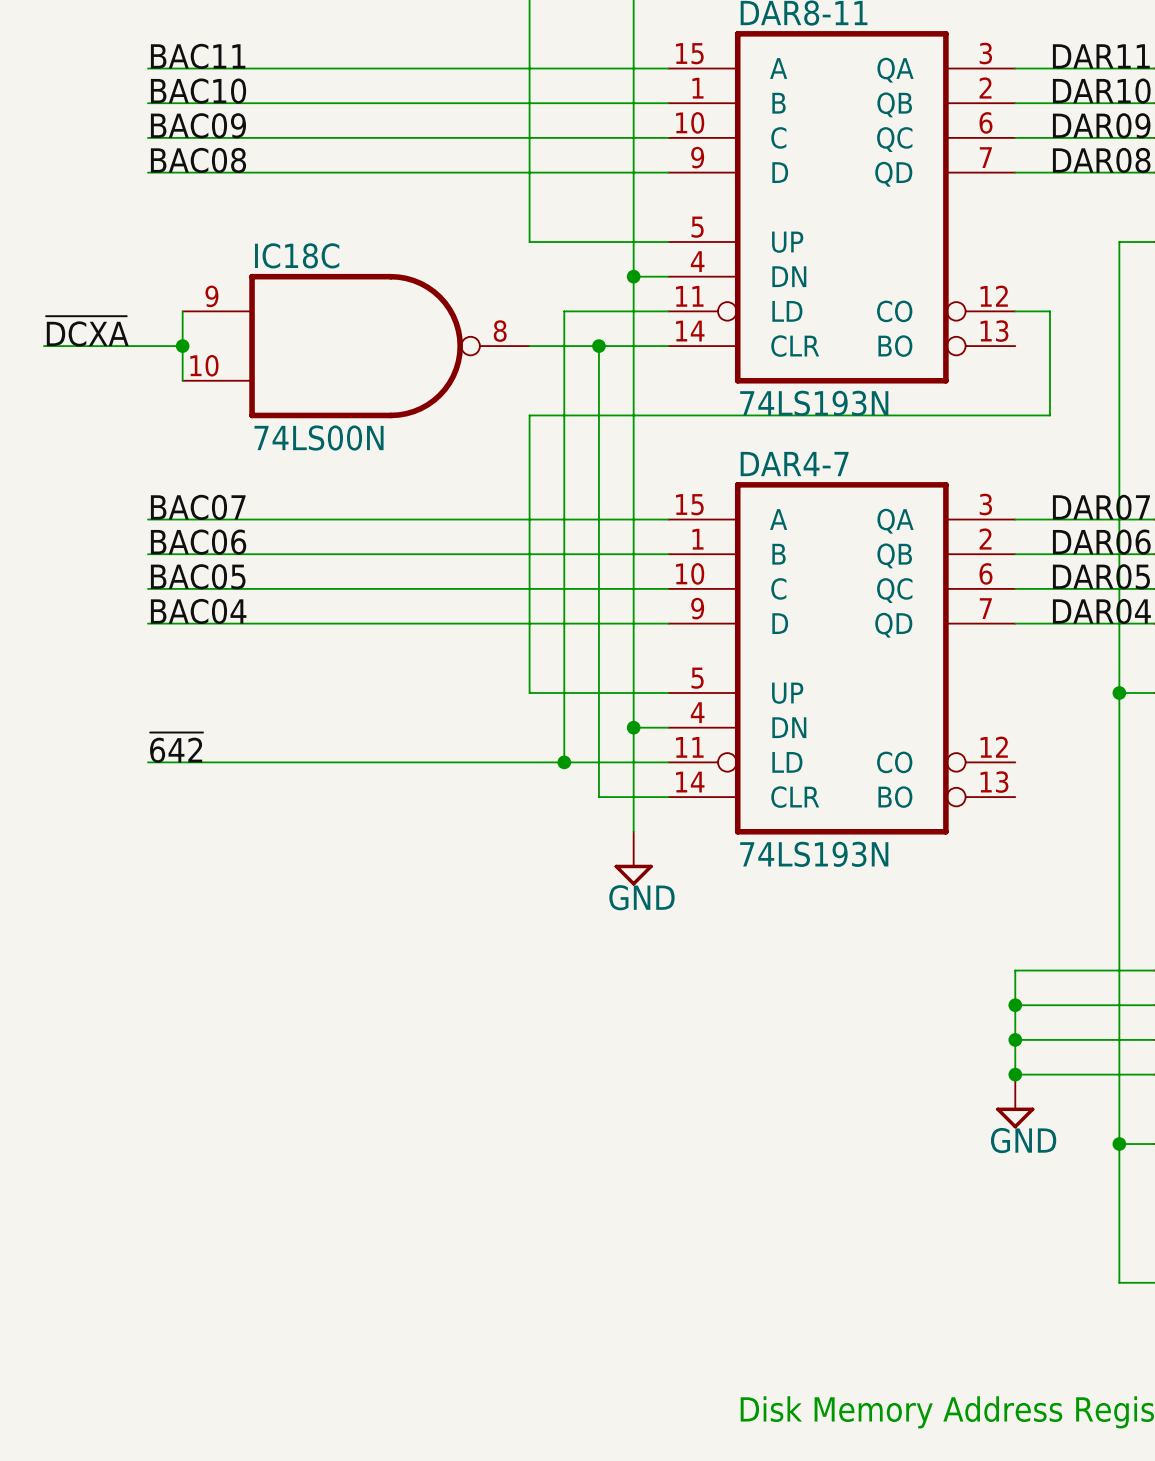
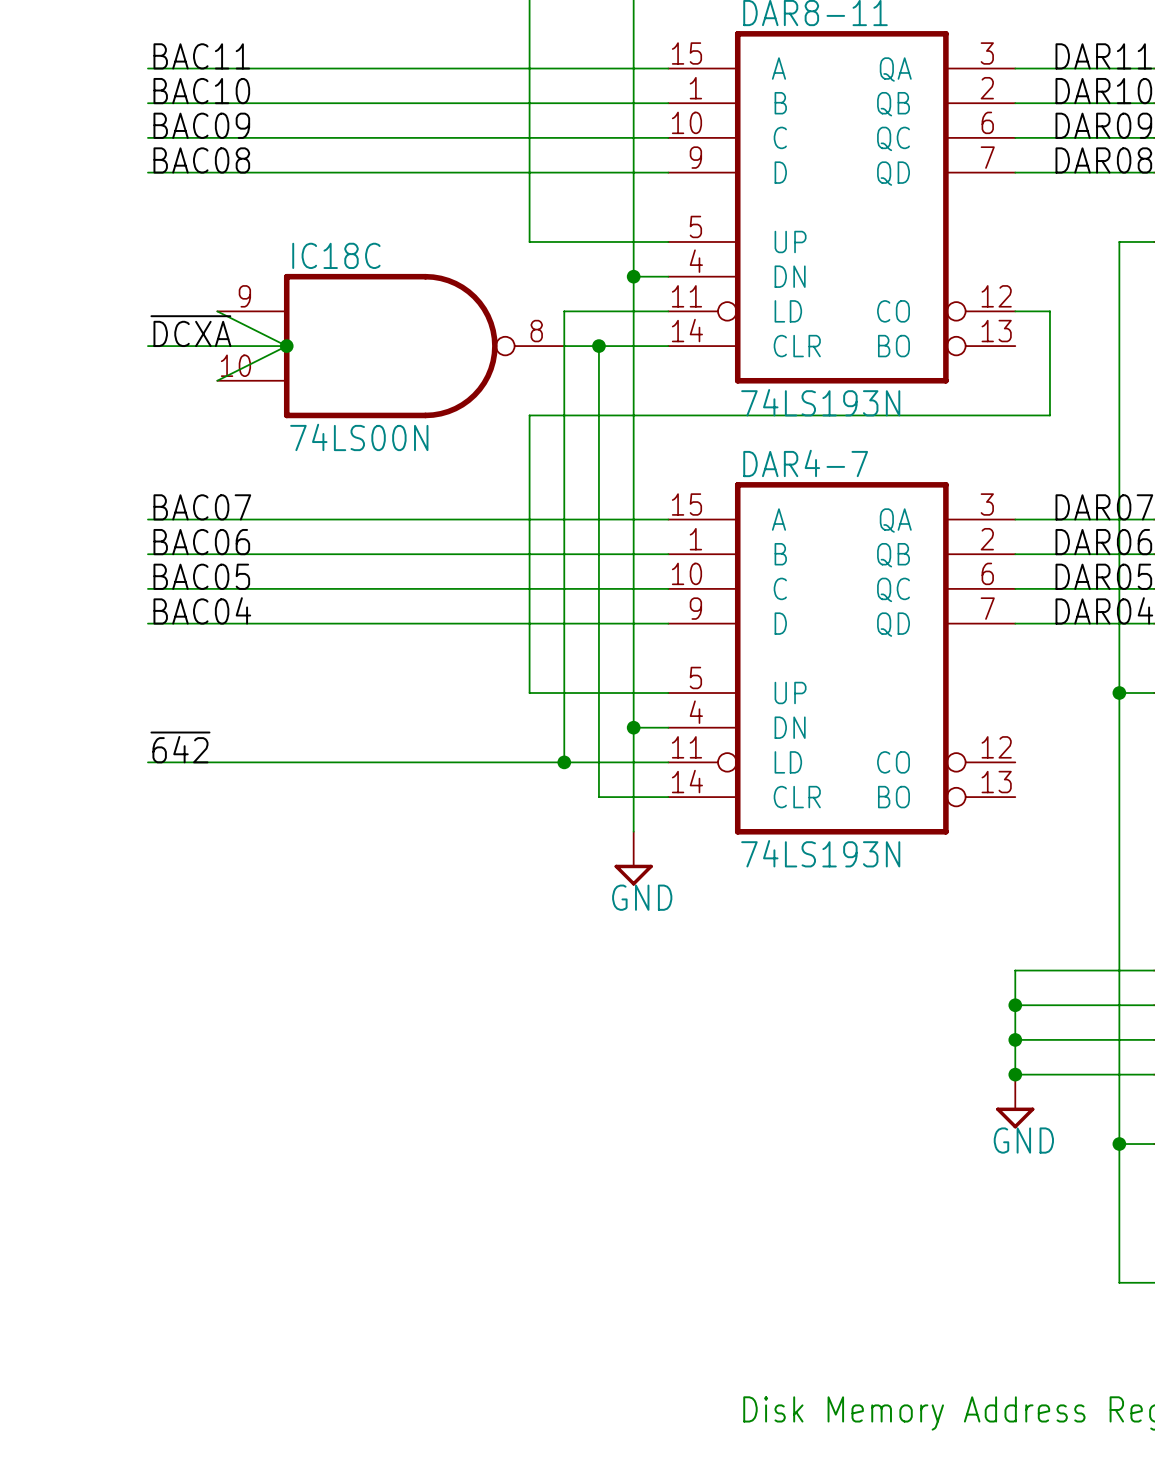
wire: (182, 311) (182, 380) -> none
wire: none -> (217, 311) (286, 346)
label position: ~{DCXA} (87, 331) -> ~{DCXA} (190, 331)
wire: (43, 346) (147, 346) -> (182, 346) (286, 346)
junction: (182, 346) -> none
wire: none -> (286, 346) (217, 380)
junction: none -> (286, 346)
IC18C position: (356, 346) -> (390, 346)

